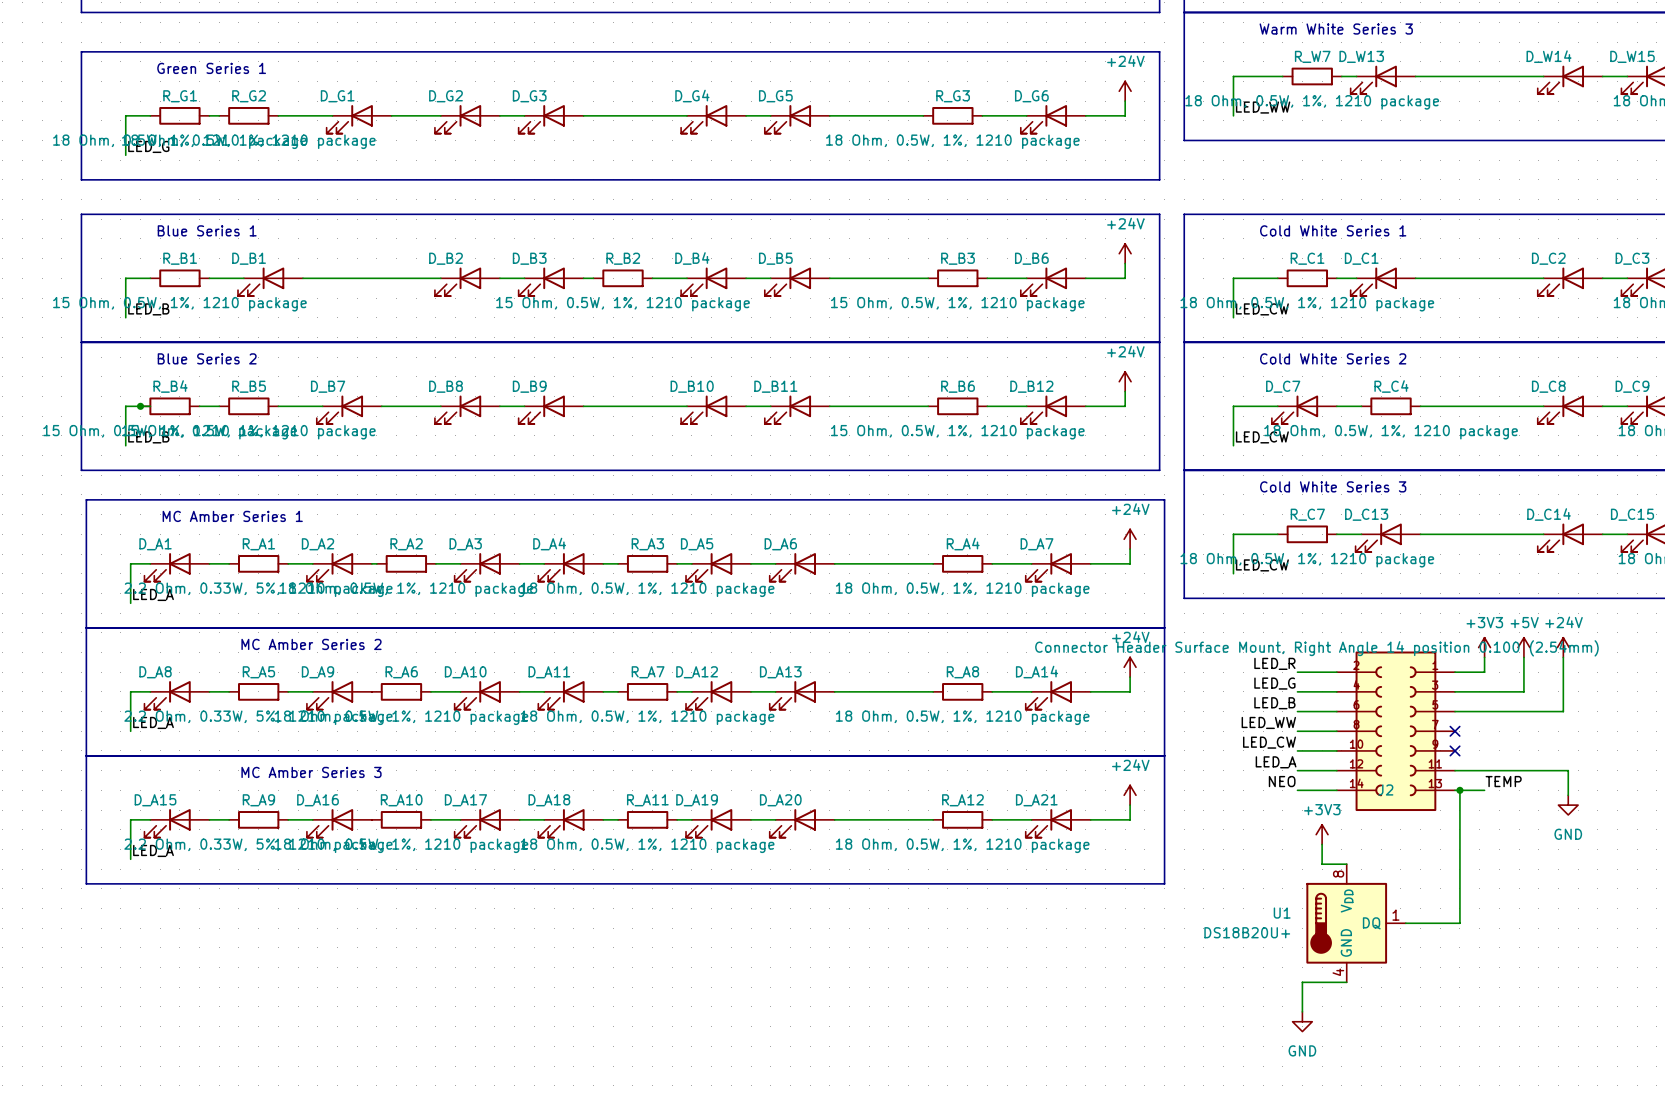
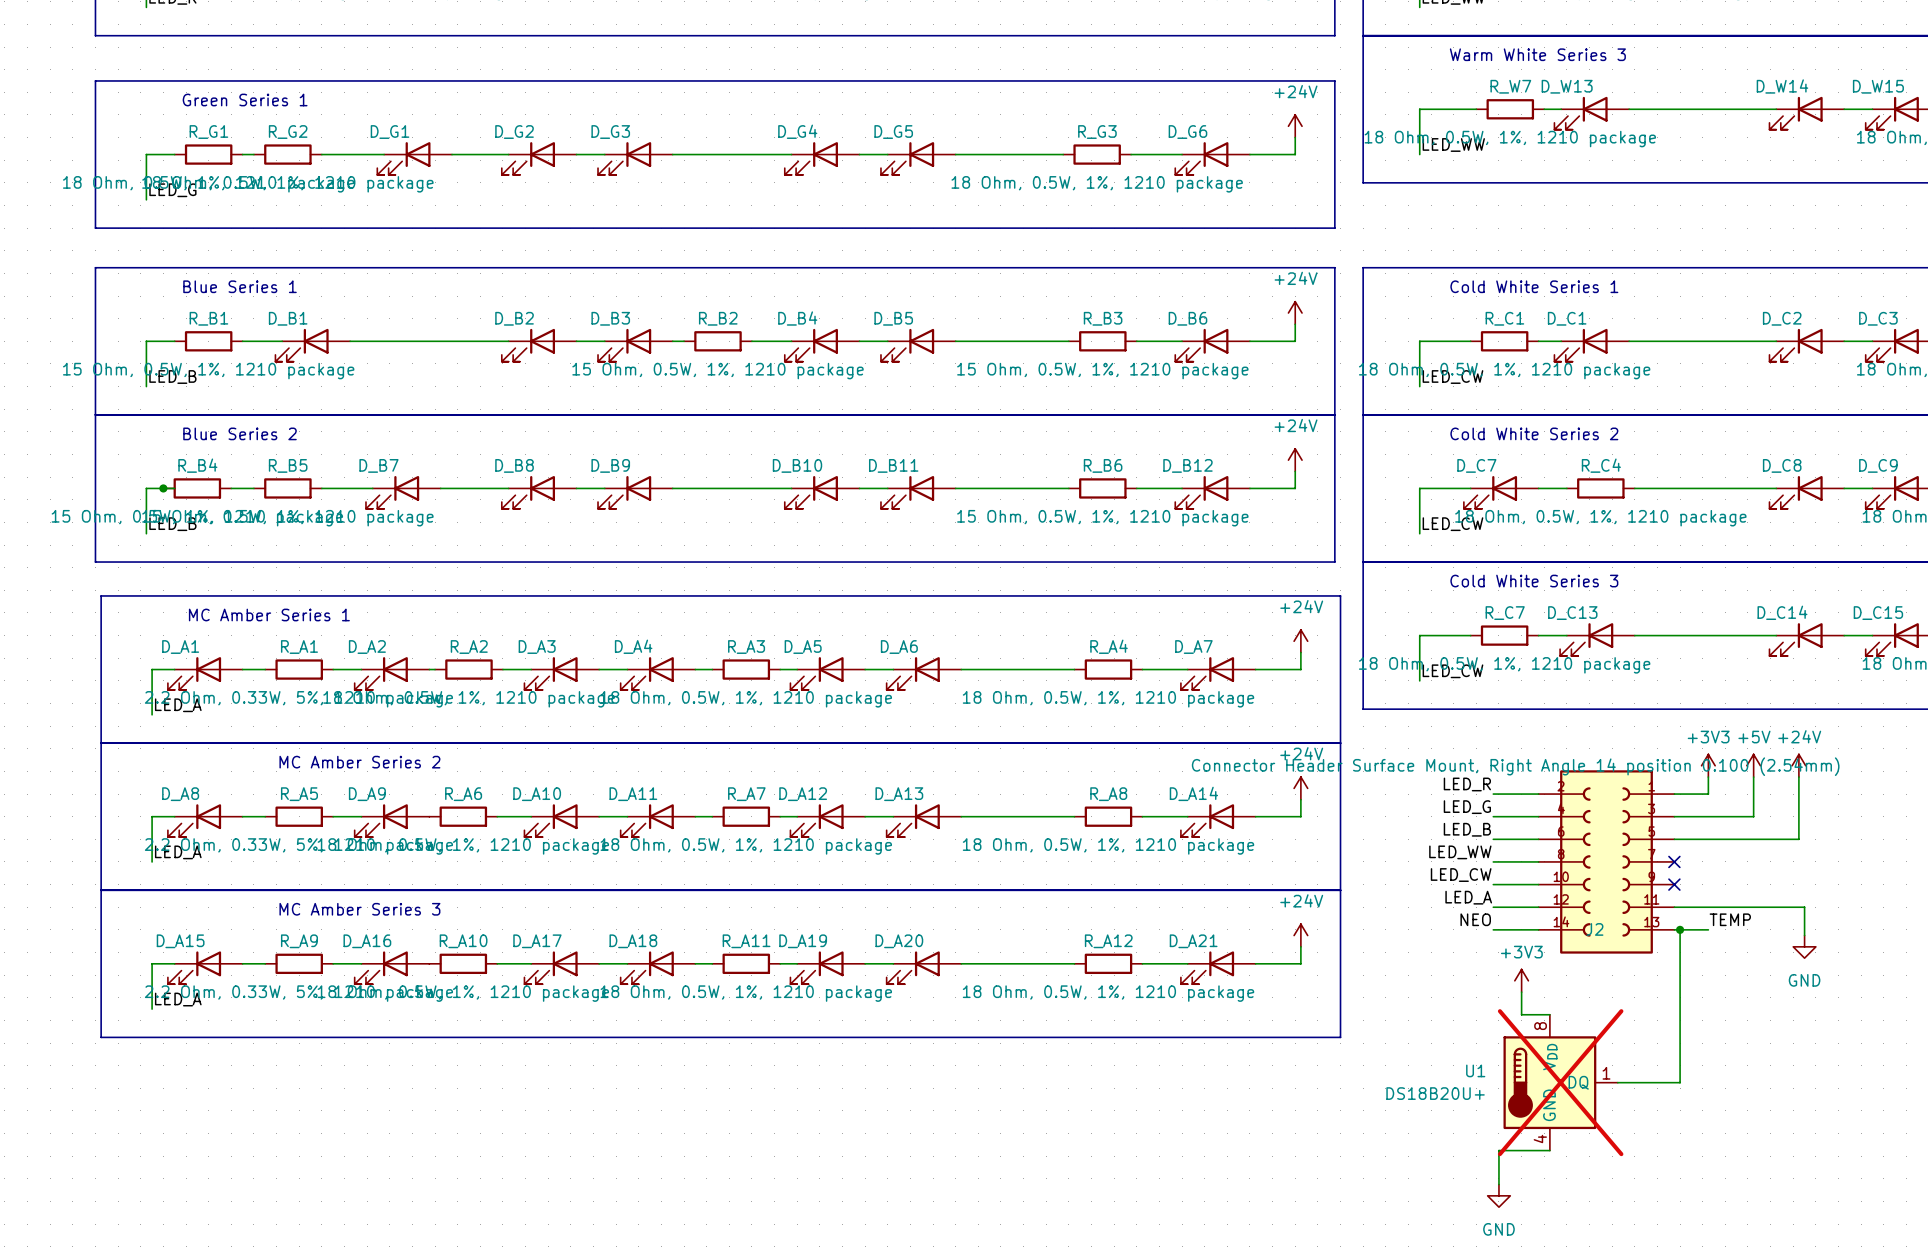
U1 do-not-place cross: none -> (1560, 1082)

